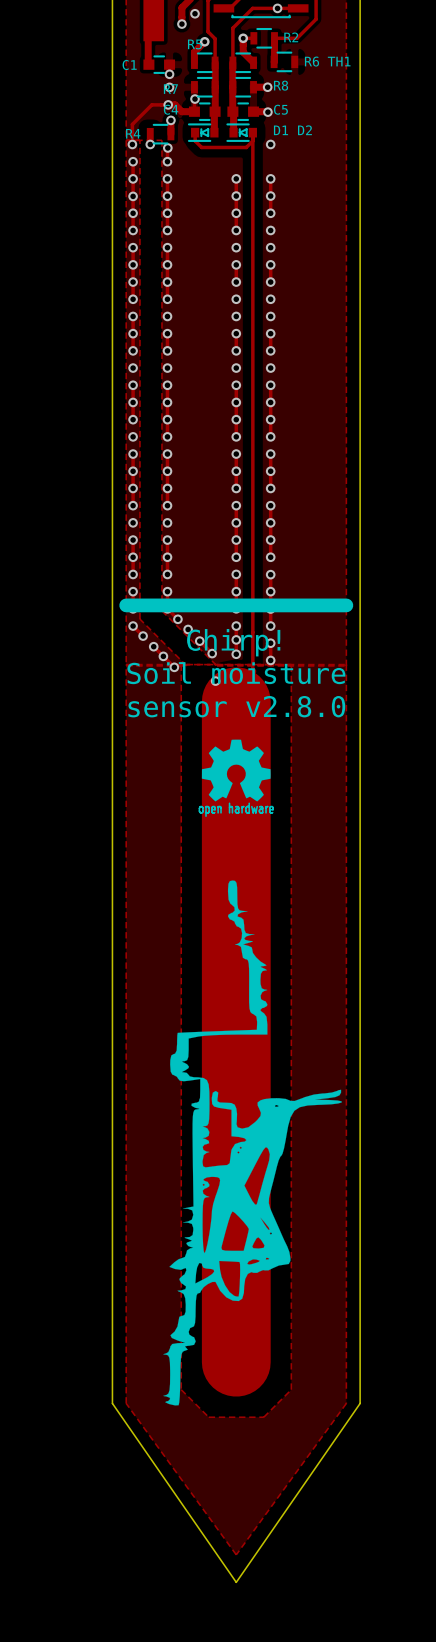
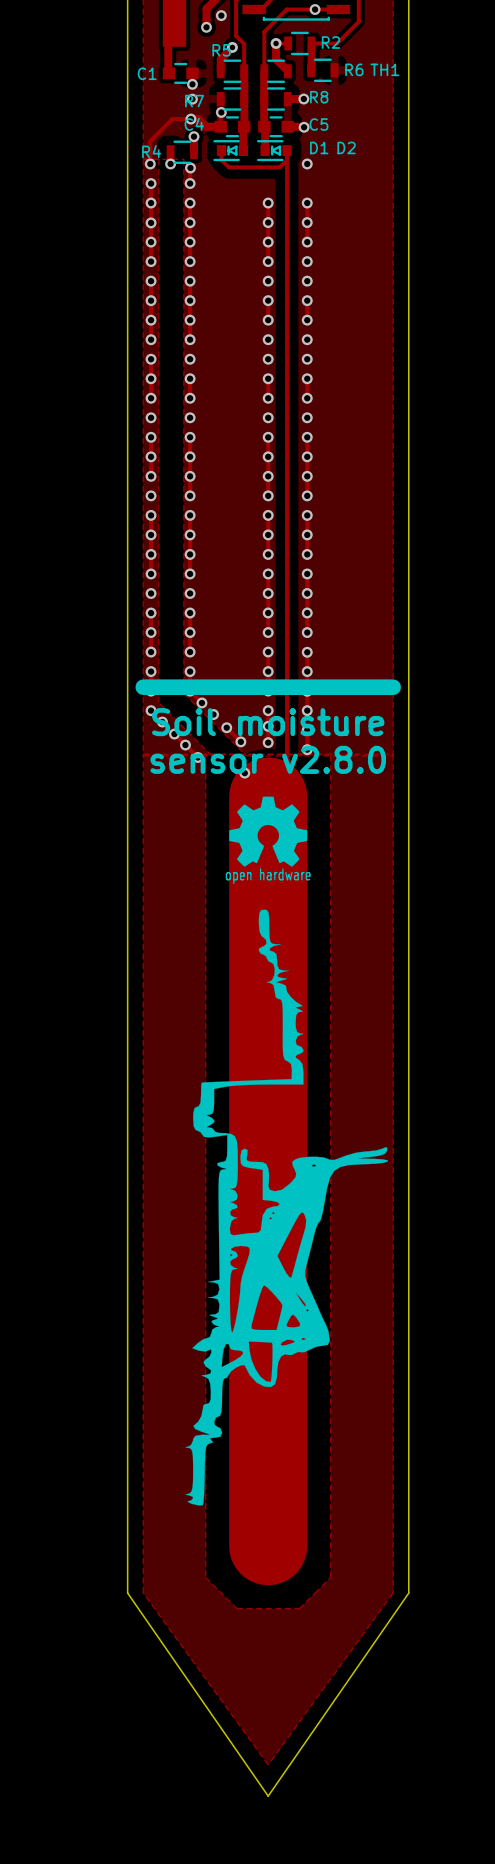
text: Chirp! (233, 642) -> Soil moisture (268, 722)
text: Soil moisture (236, 673) -> sensor v2.8.0 (268, 759)
text: sensor v2.8.0 (236, 706) -> none
drawing position: (236, 778) -> (268, 840)
drawing position: (252, 1142) -> (286, 1207)

